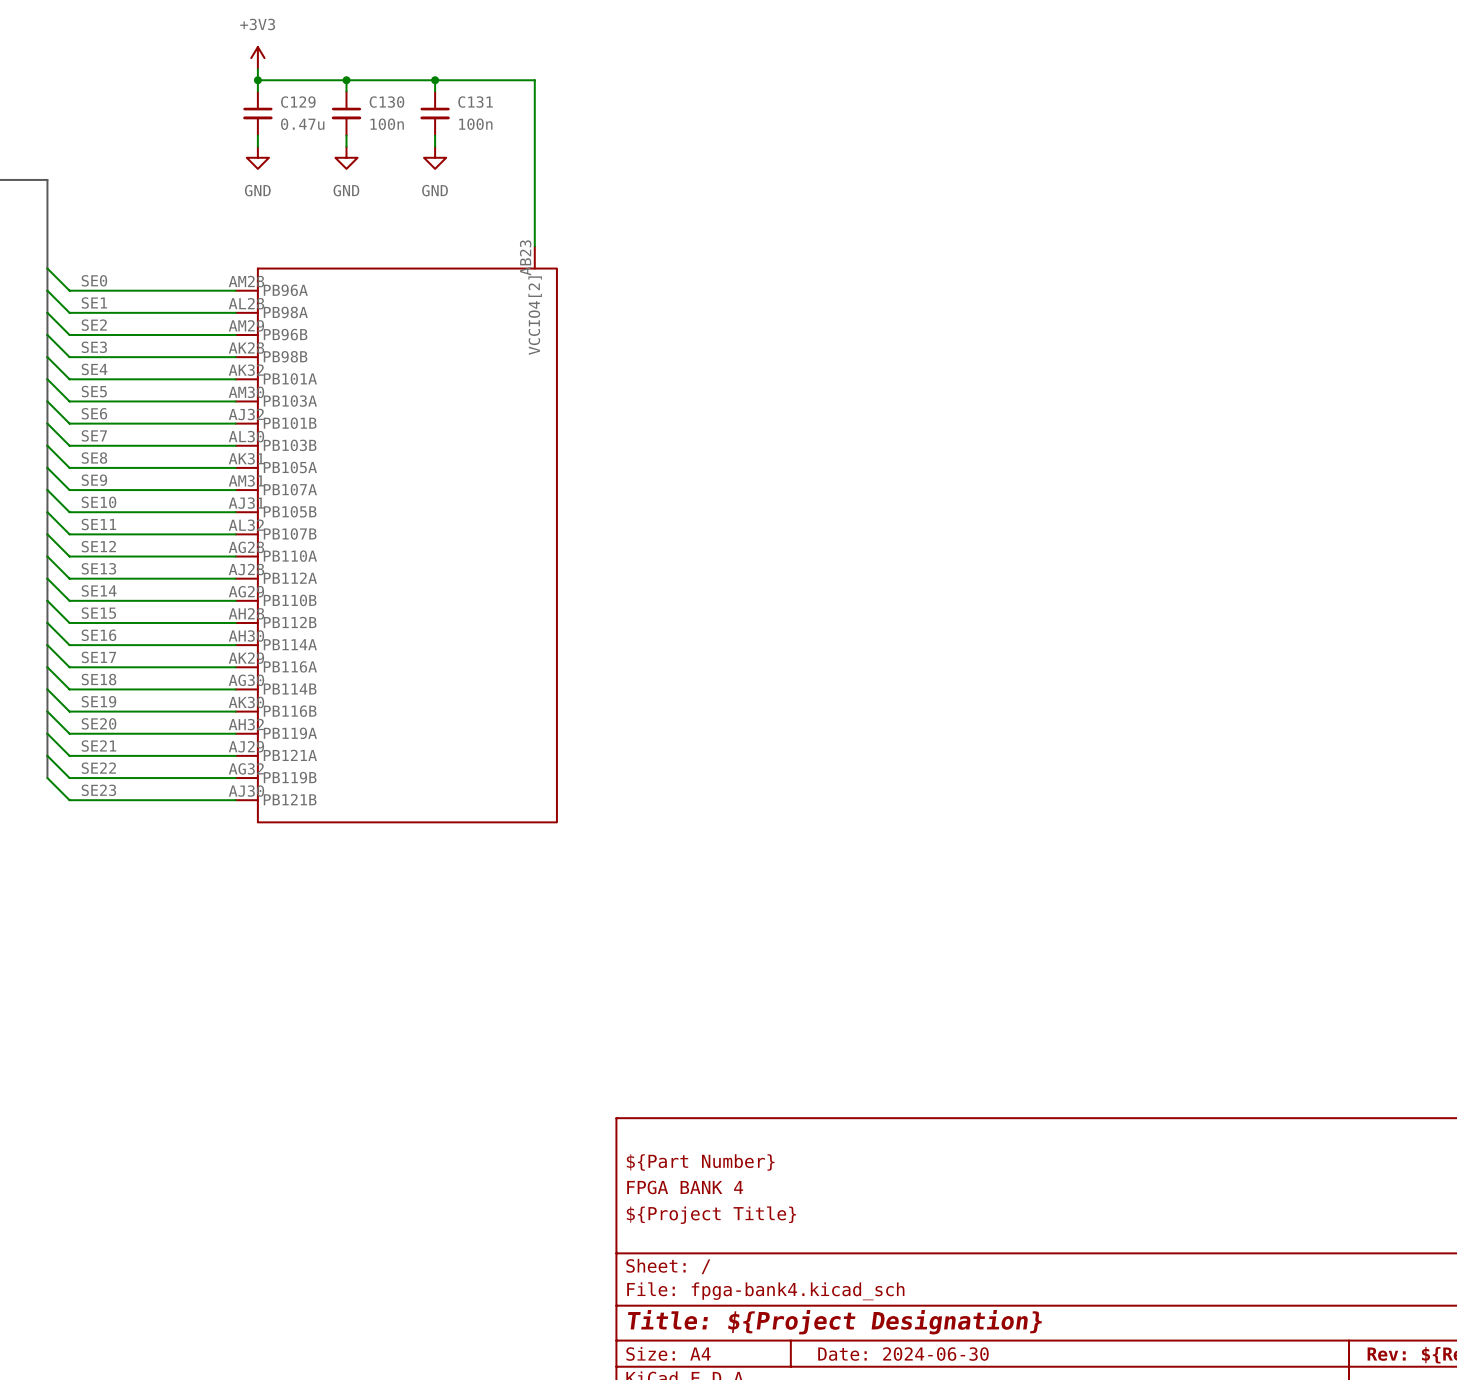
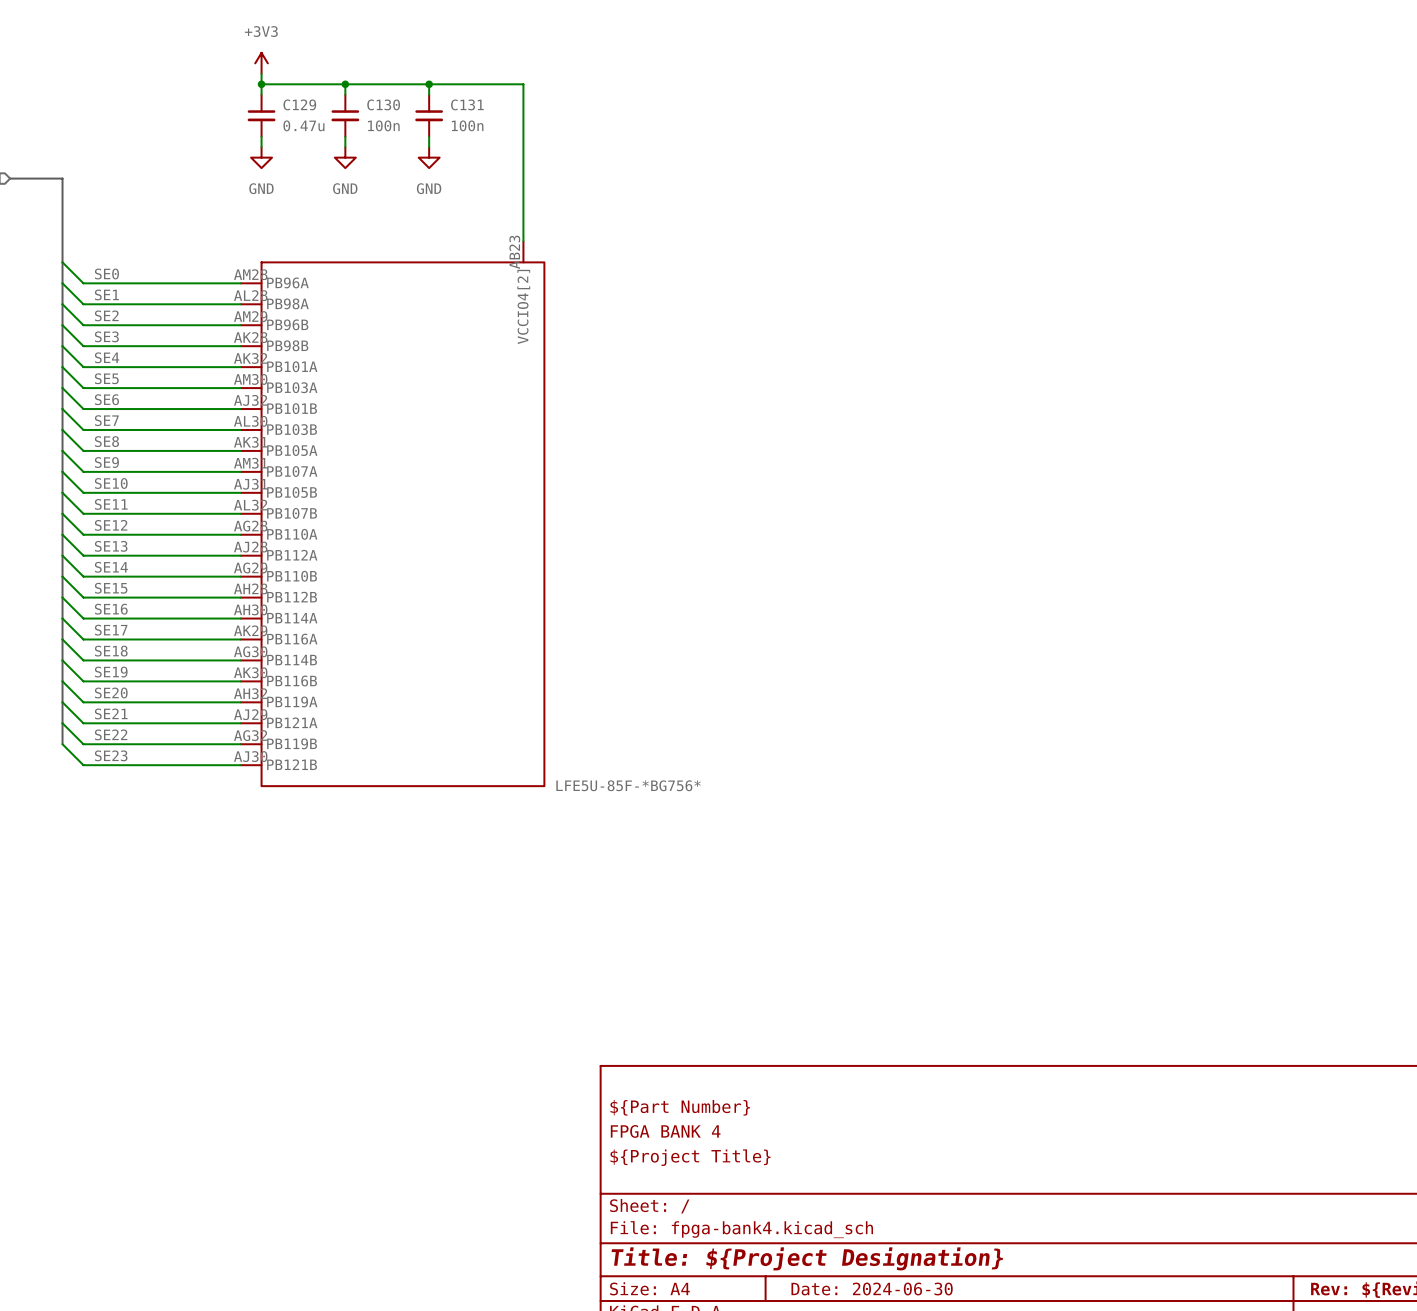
part value: none -> LFE5U-85F-*BG756* (628, 785)

